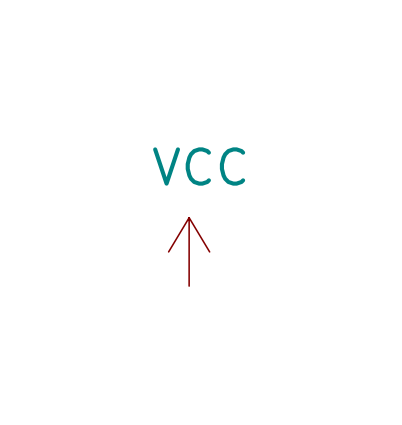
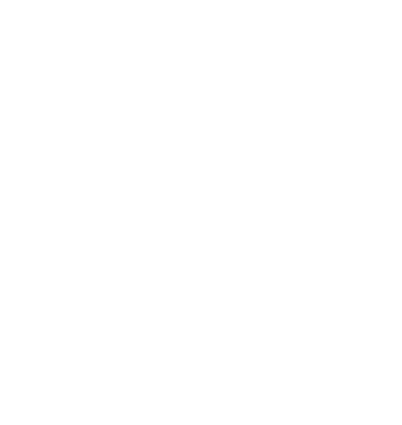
power symbol: VCC (189, 251) -> none

